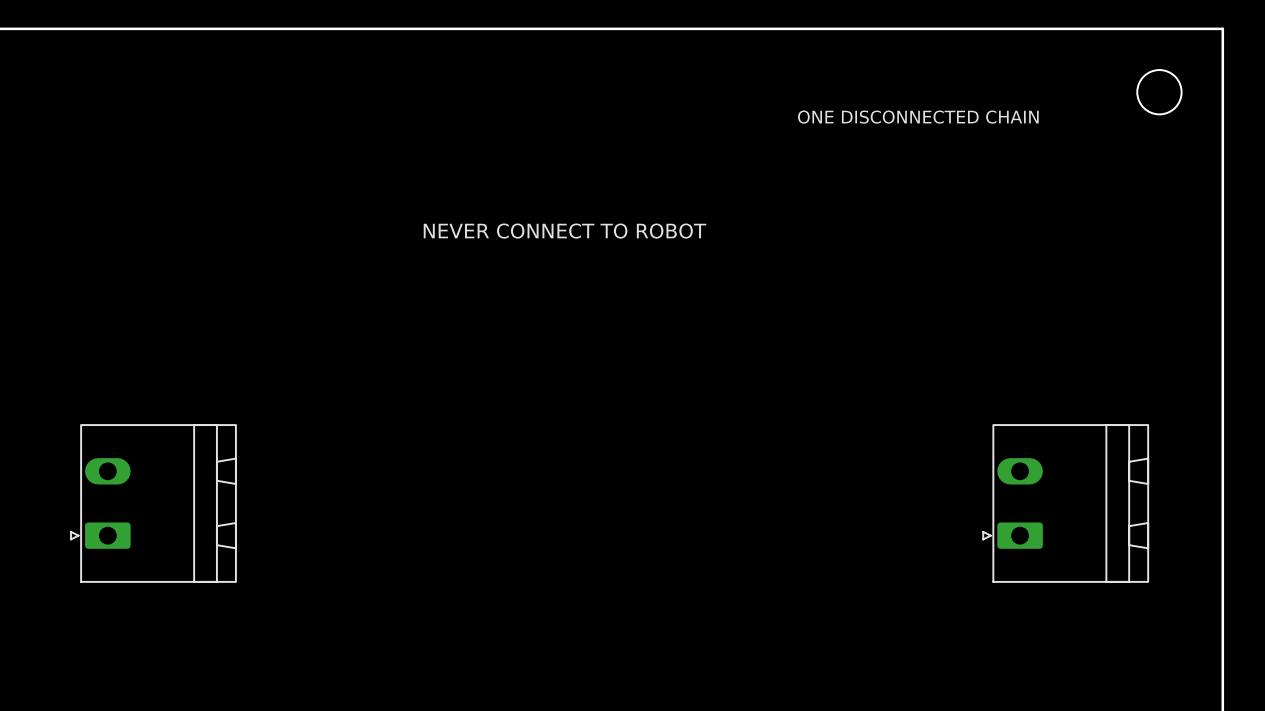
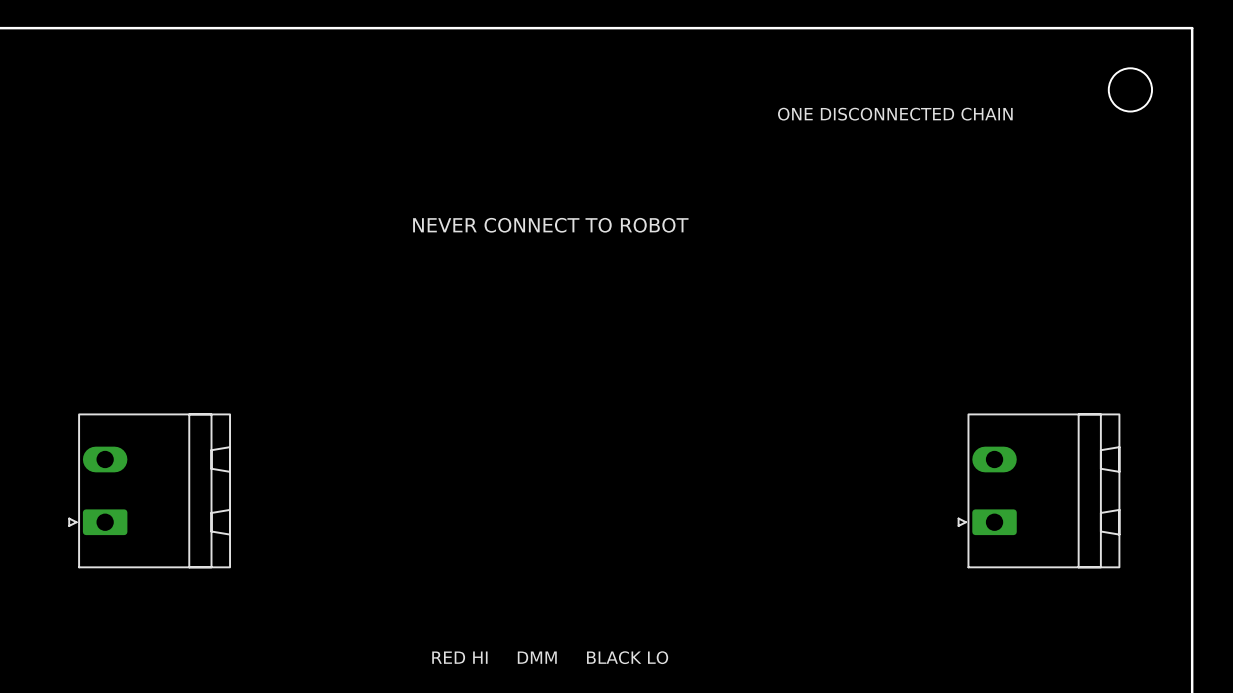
text: none -> RED HI DMM BLACK LO (550, 657)

